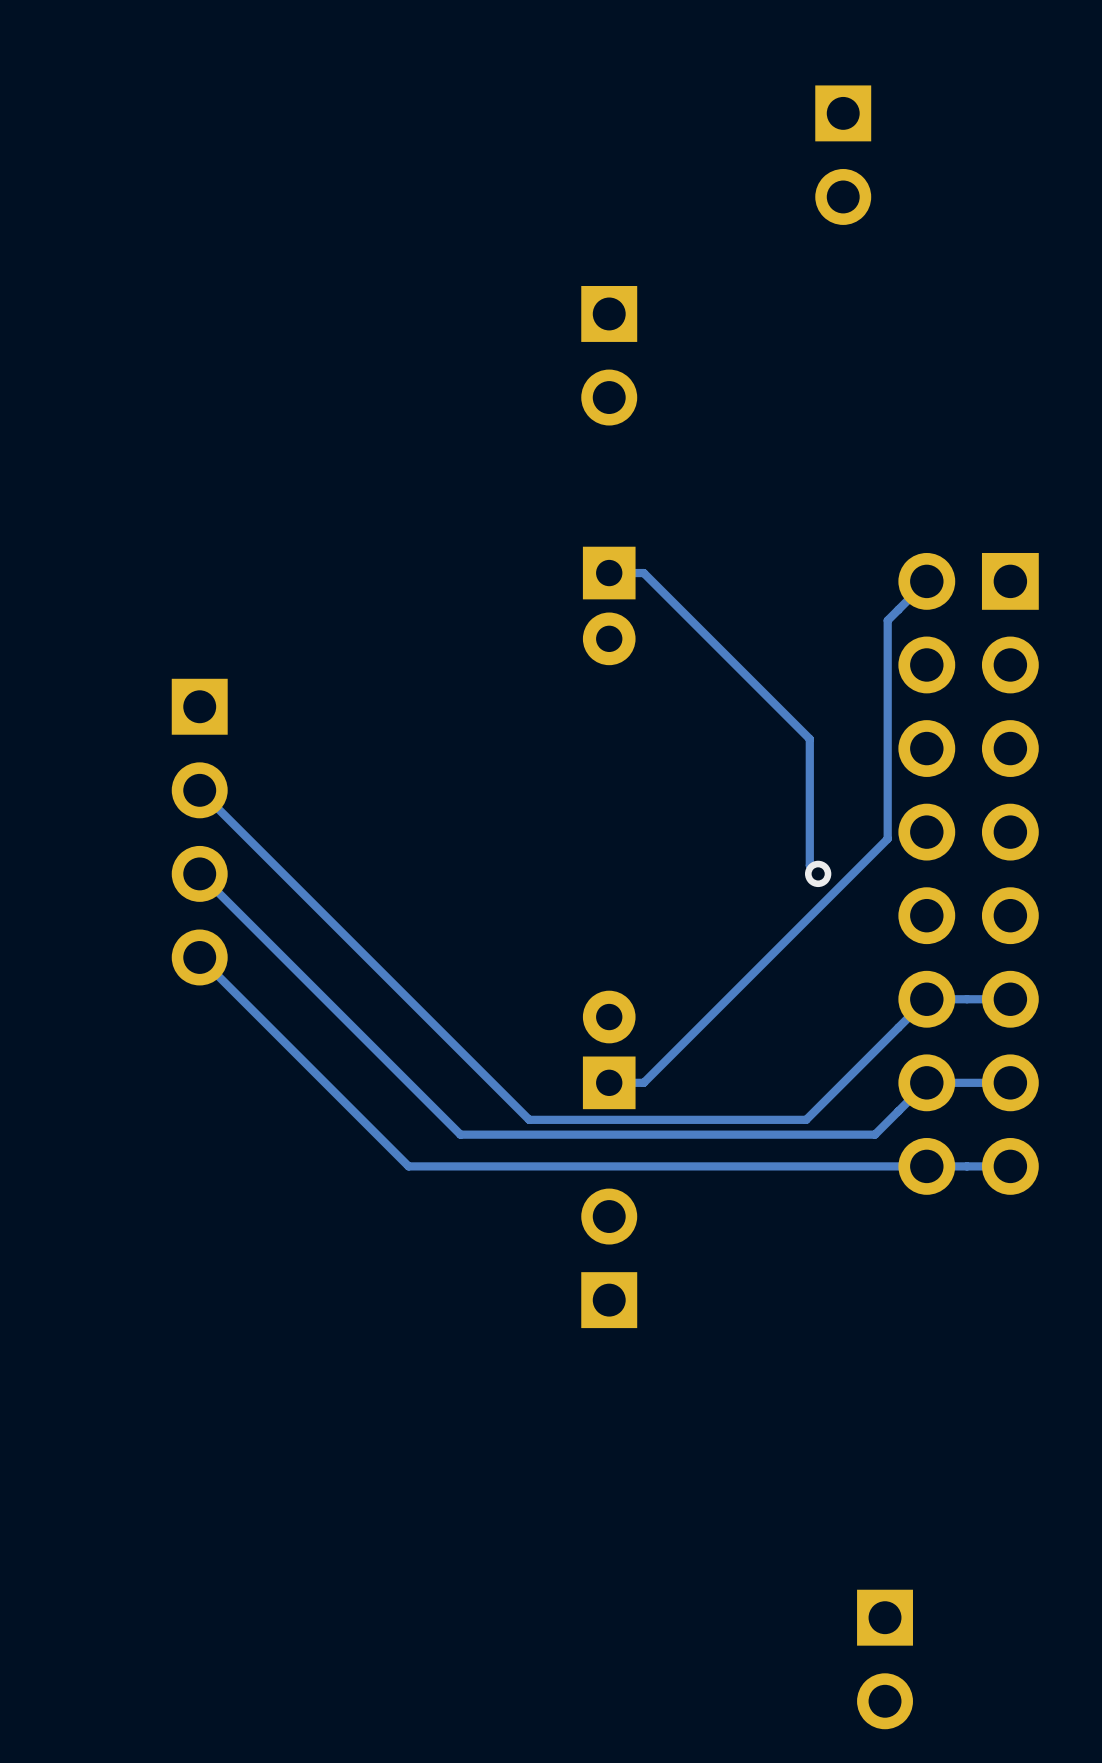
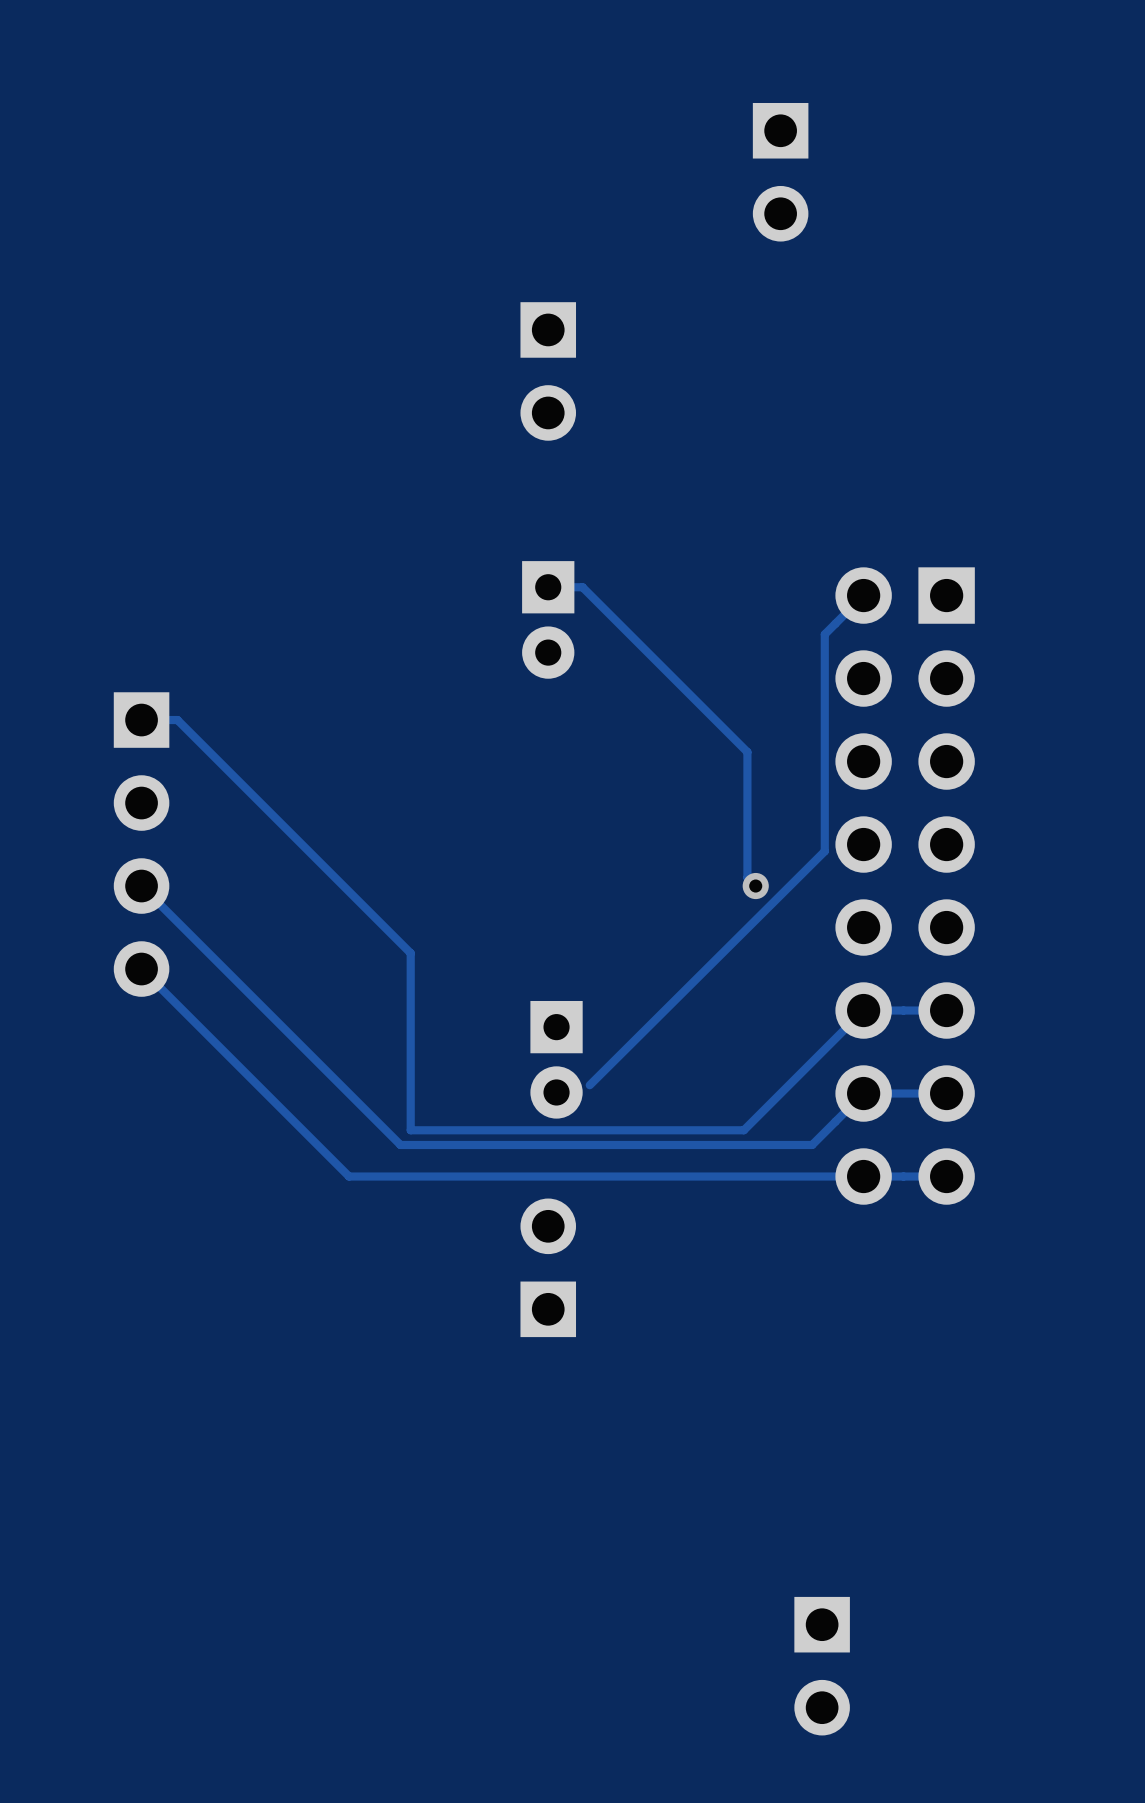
track: (199, 790) (529, 1119) -> (141, 720) (177, 720) (410, 953) (410, 1130) (468, 1130)
track: (887, 838) (643, 1082) (609, 1082) -> (824, 851) (589, 1085)
part rotation: 0° (609, 1049) -> 180° (556, 1059)

